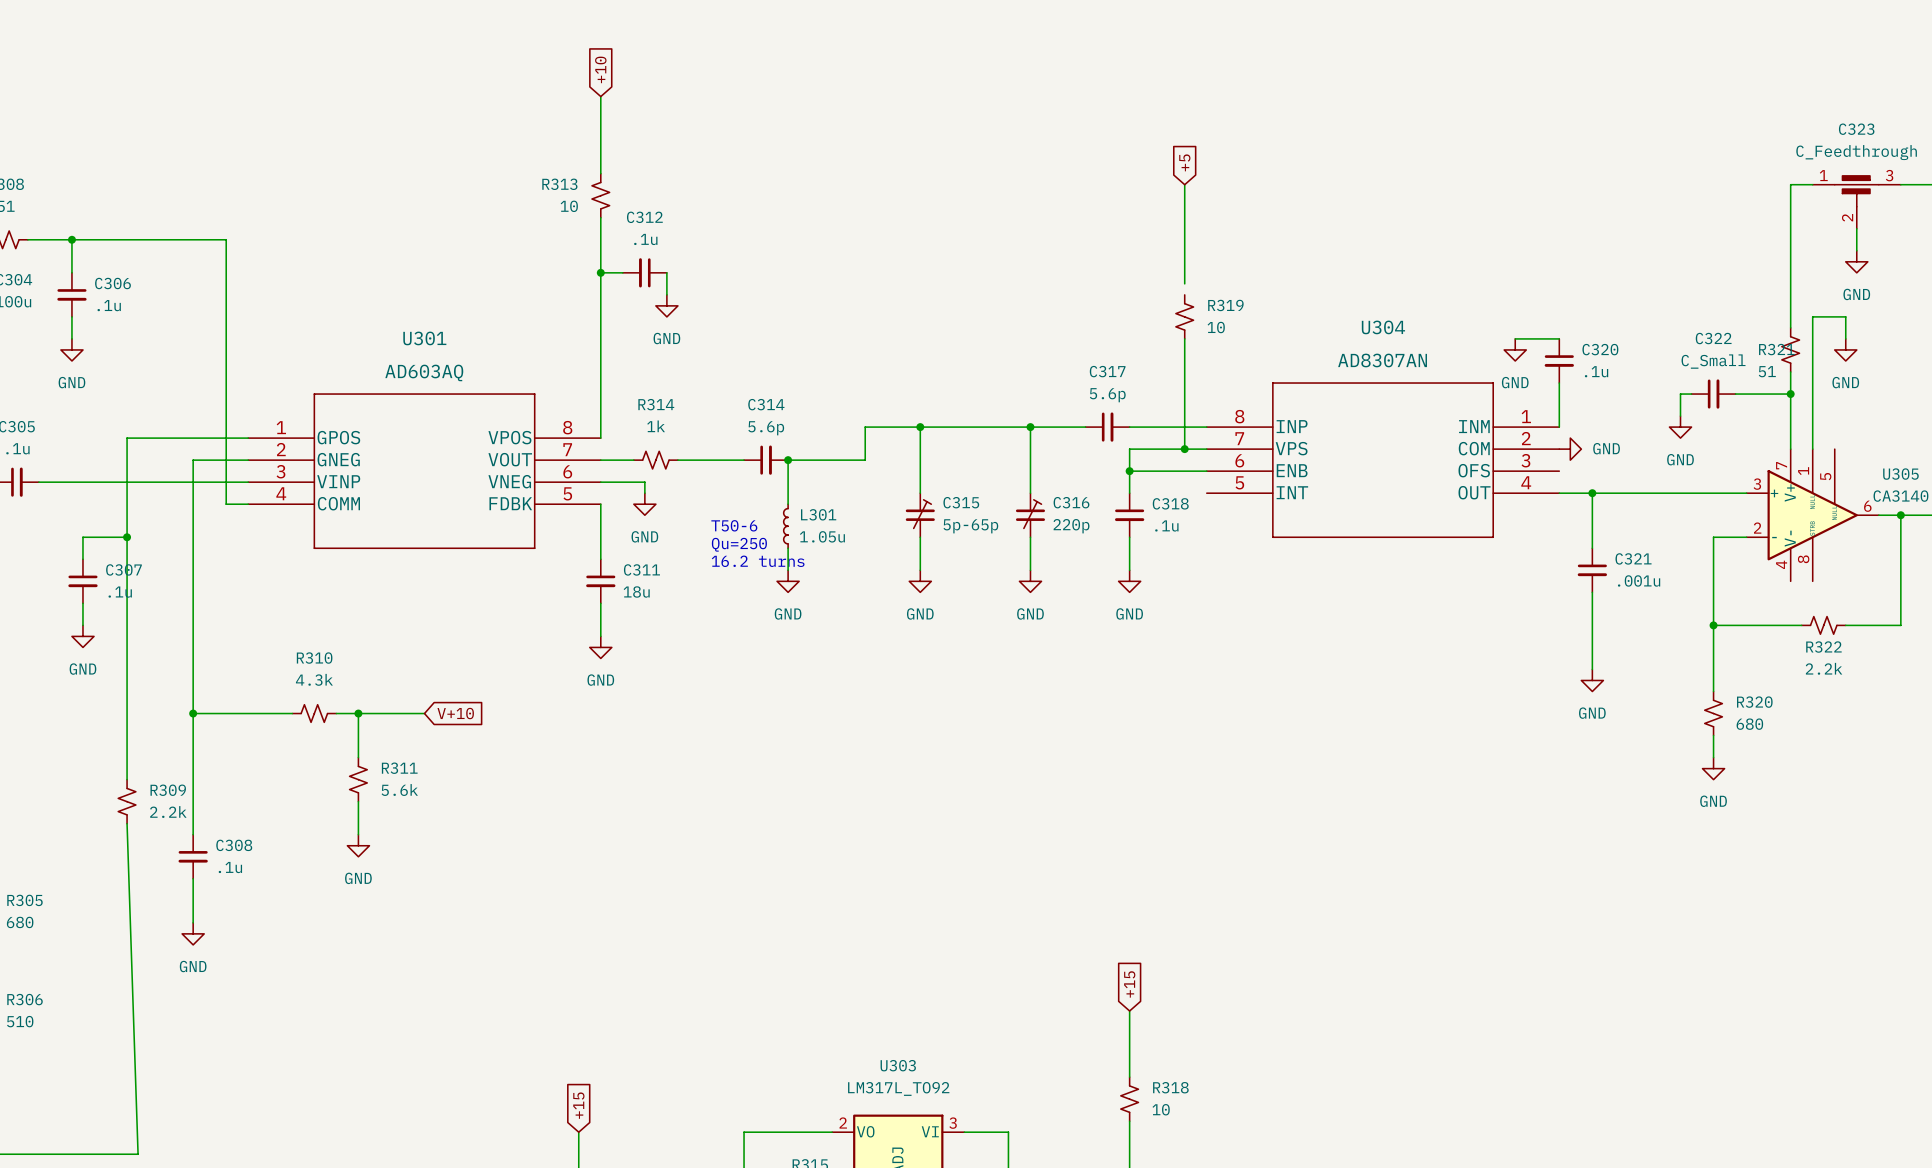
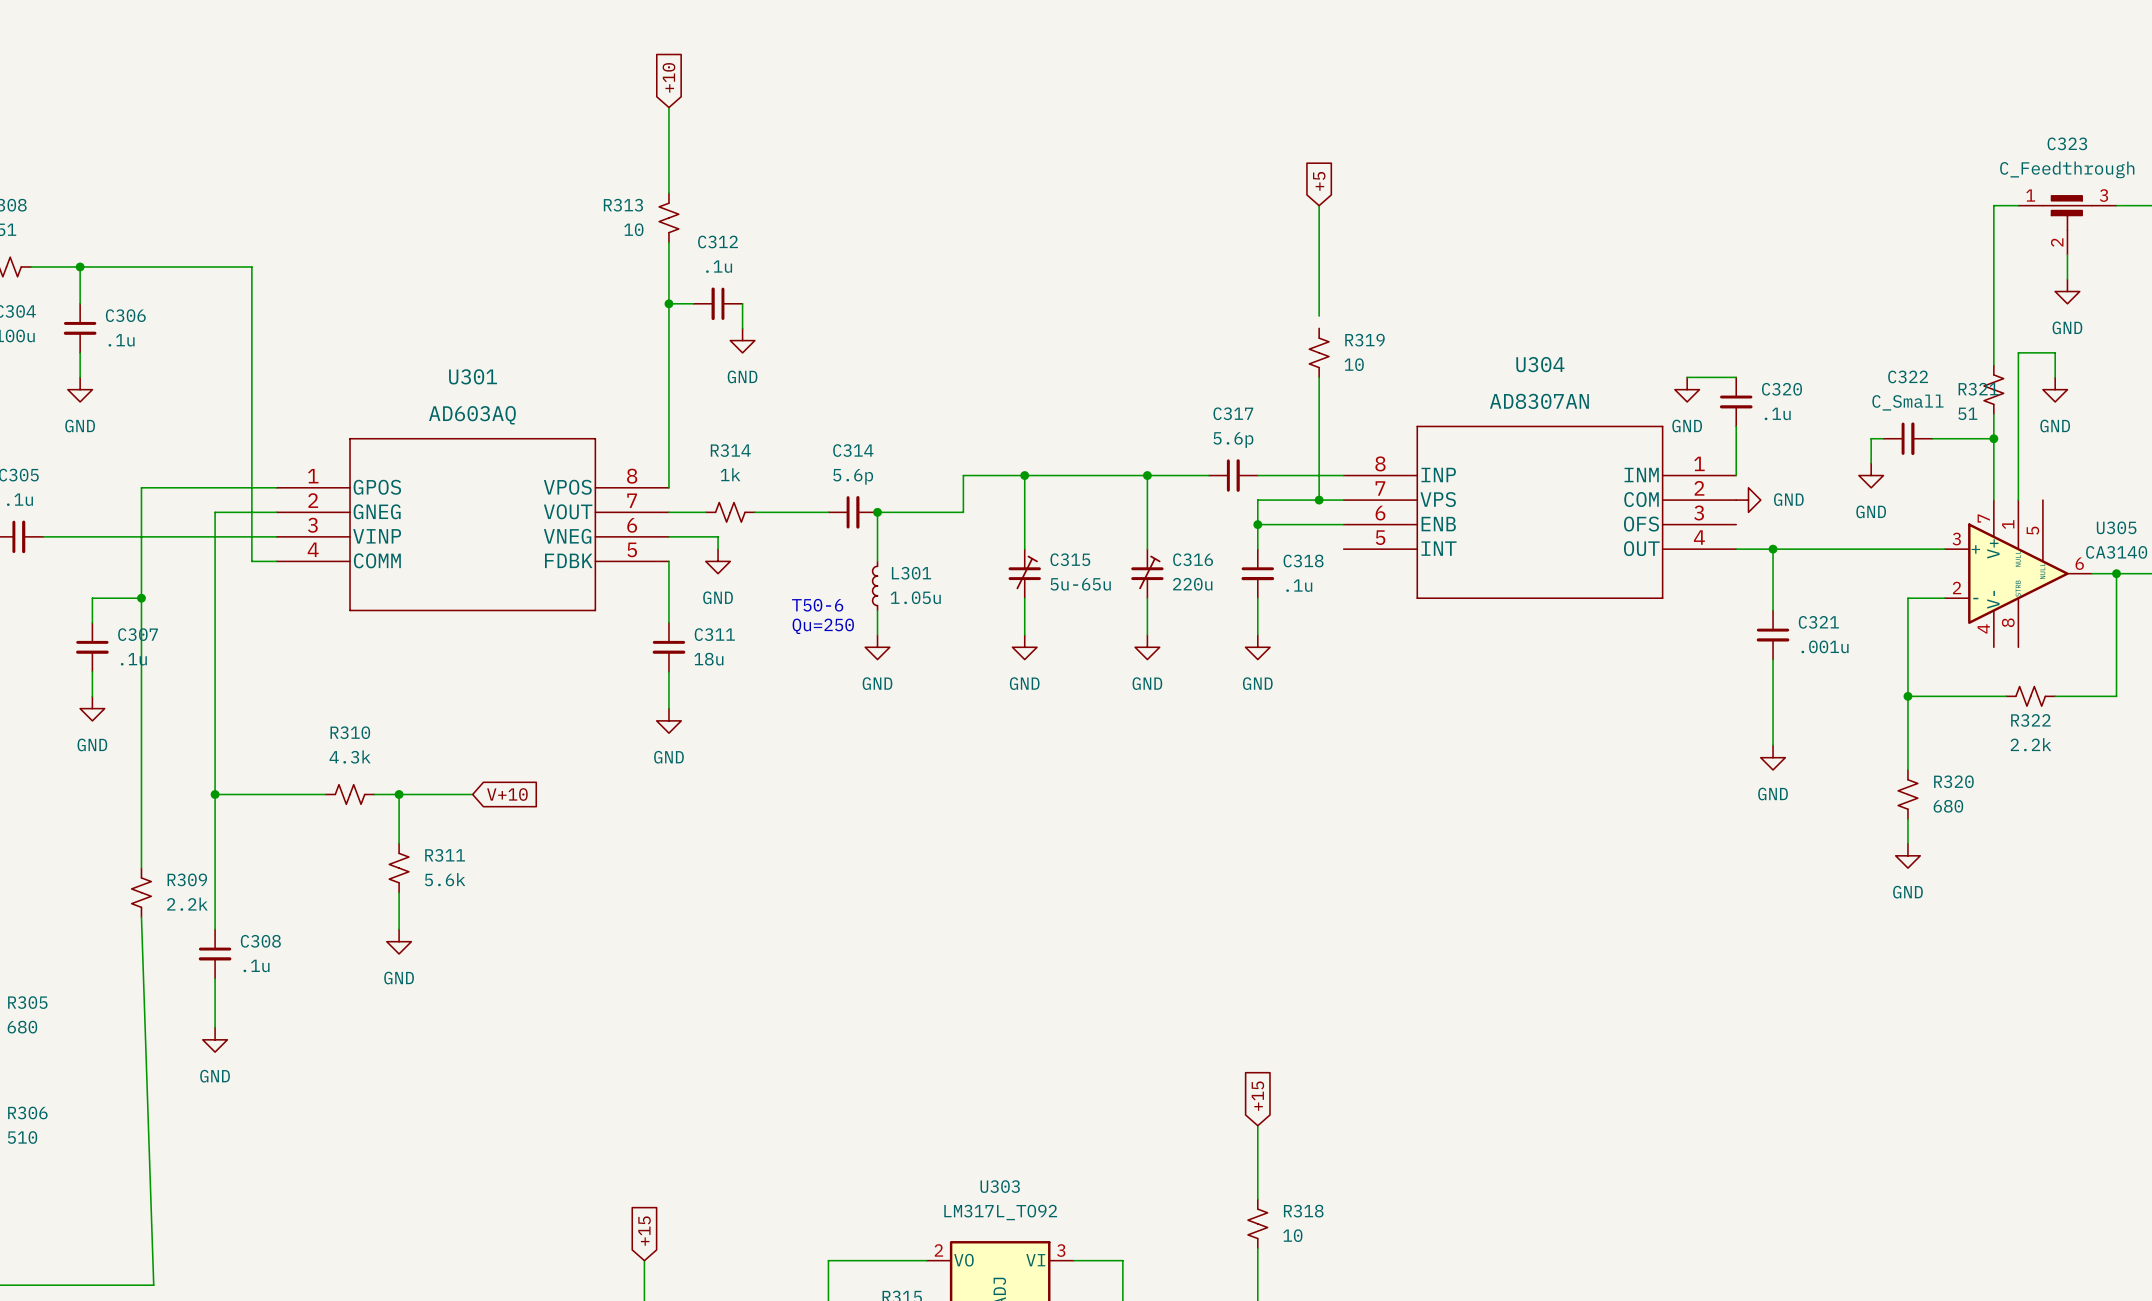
text: T50-6 (734, 525) -> none
C315 value: 5p-65p (970, 526) -> 5u-65u (1080, 584)
C316 value: 220p (1071, 526) -> 220u (1192, 584)
text: Qu=250 (739, 544) -> T50-6 (817, 605)
text: 16.2 turns (758, 561) -> Qu=250 (823, 626)

